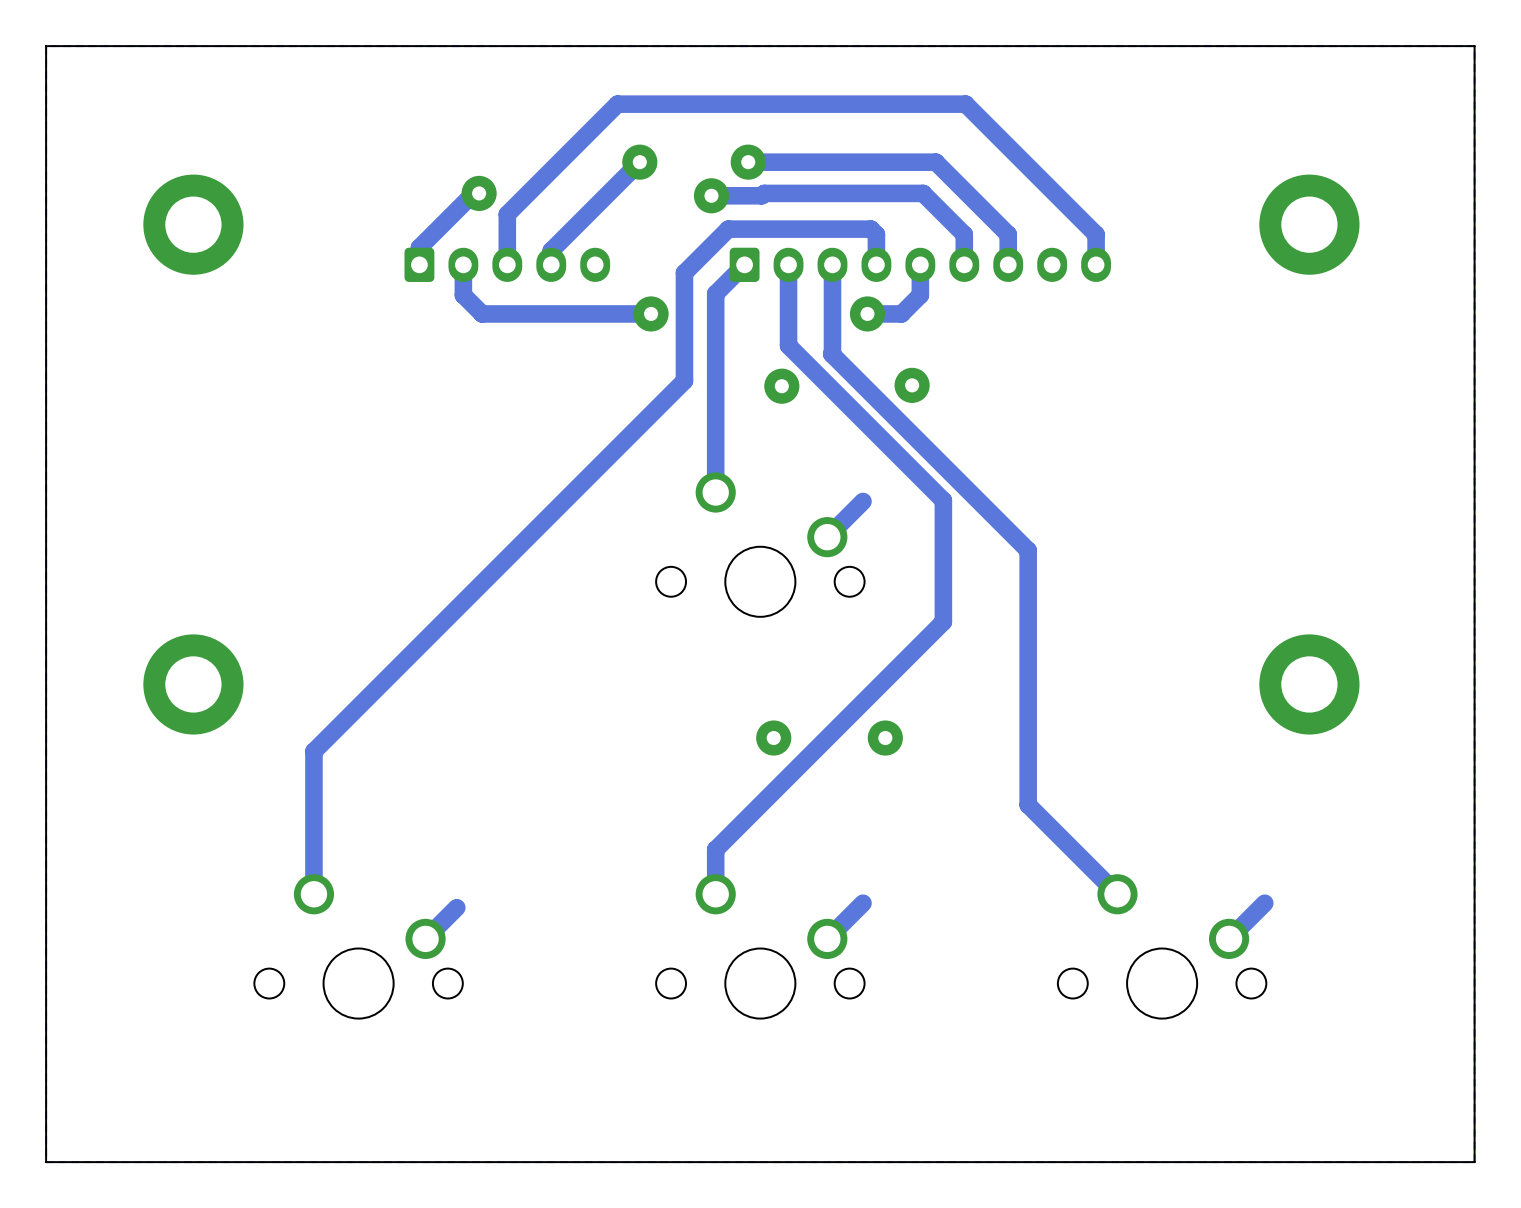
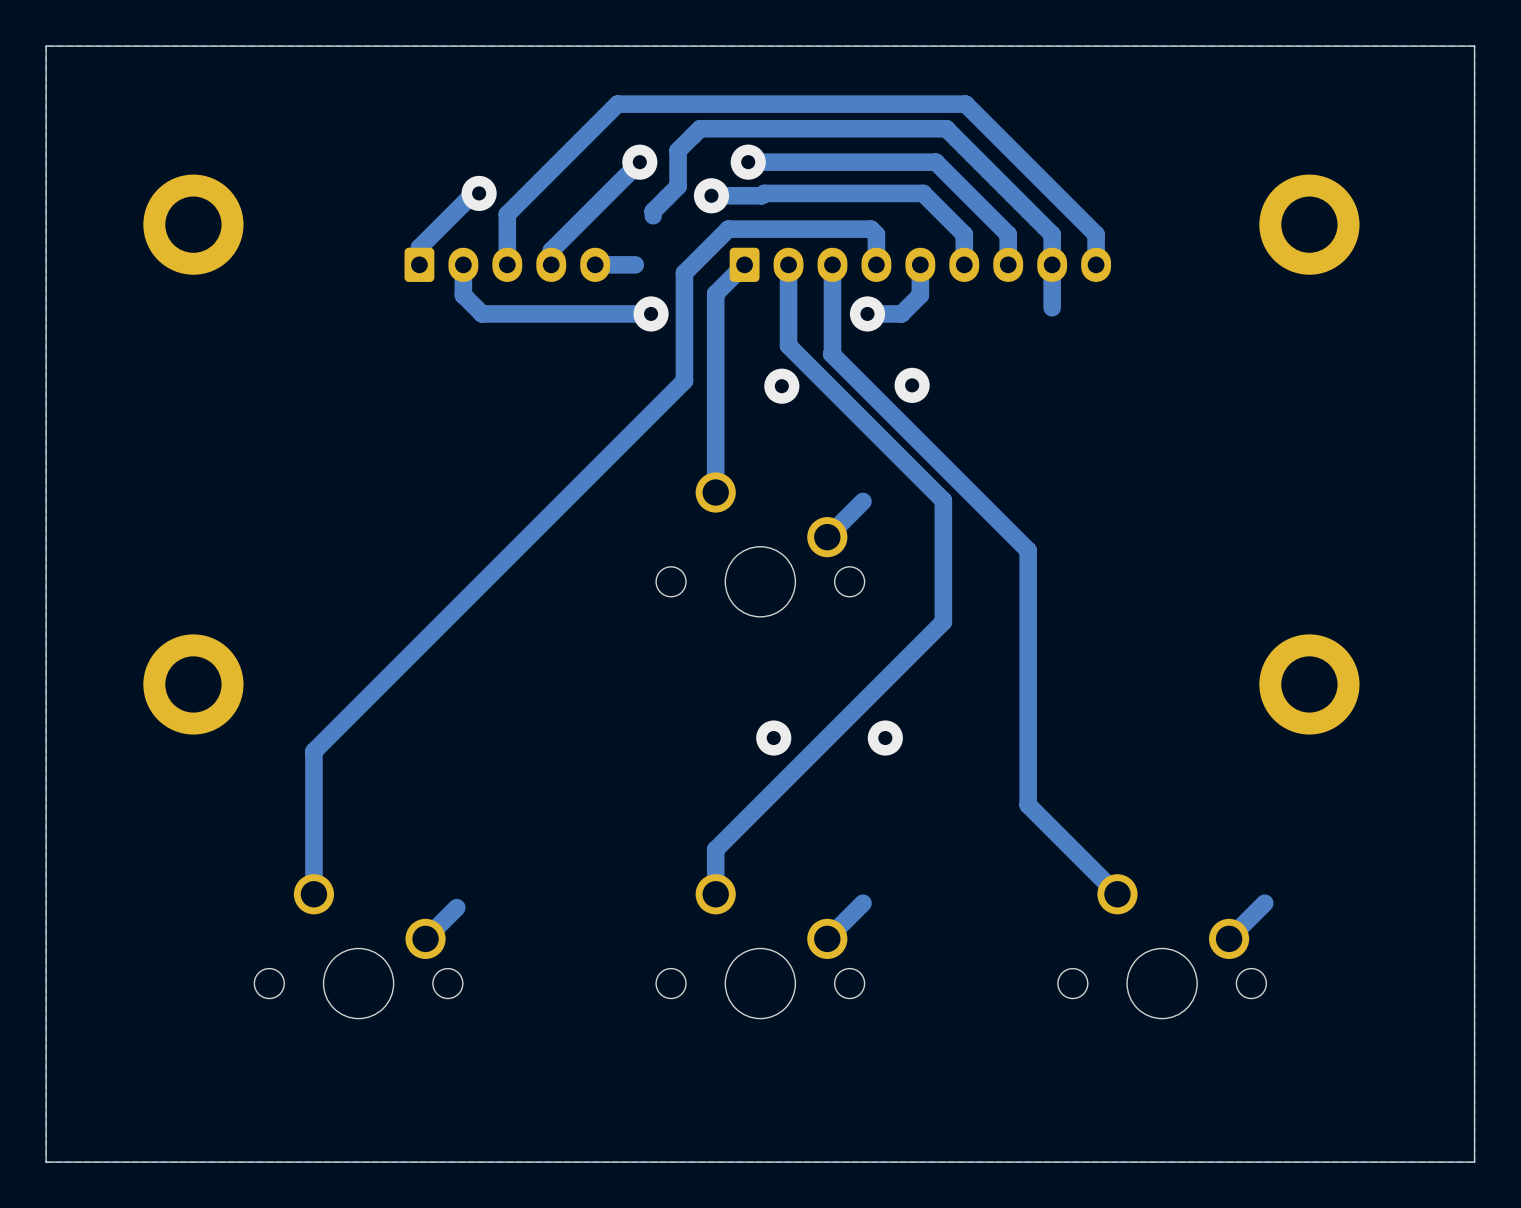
track: none -> (653, 215) (653, 211) (678, 186) (678, 150) (700, 128) (946, 128) (1052, 234) (1052, 307)
track: none -> (635, 264) (595, 264)

